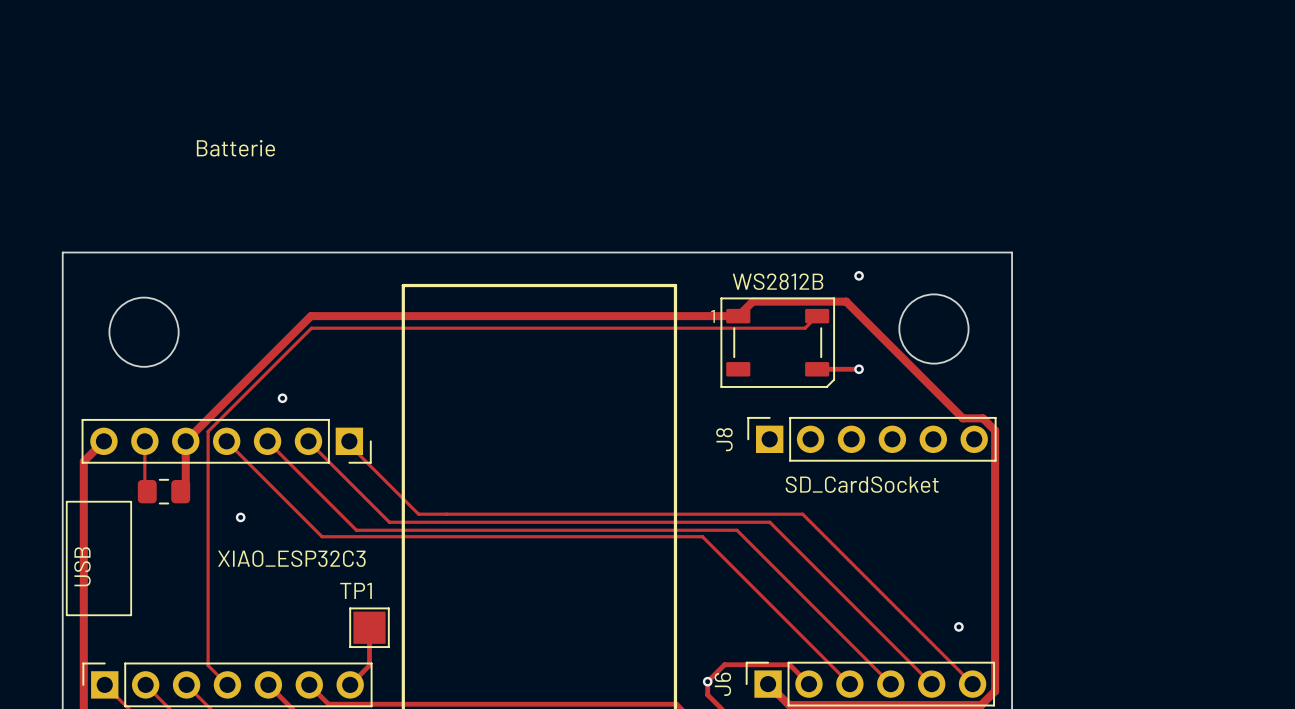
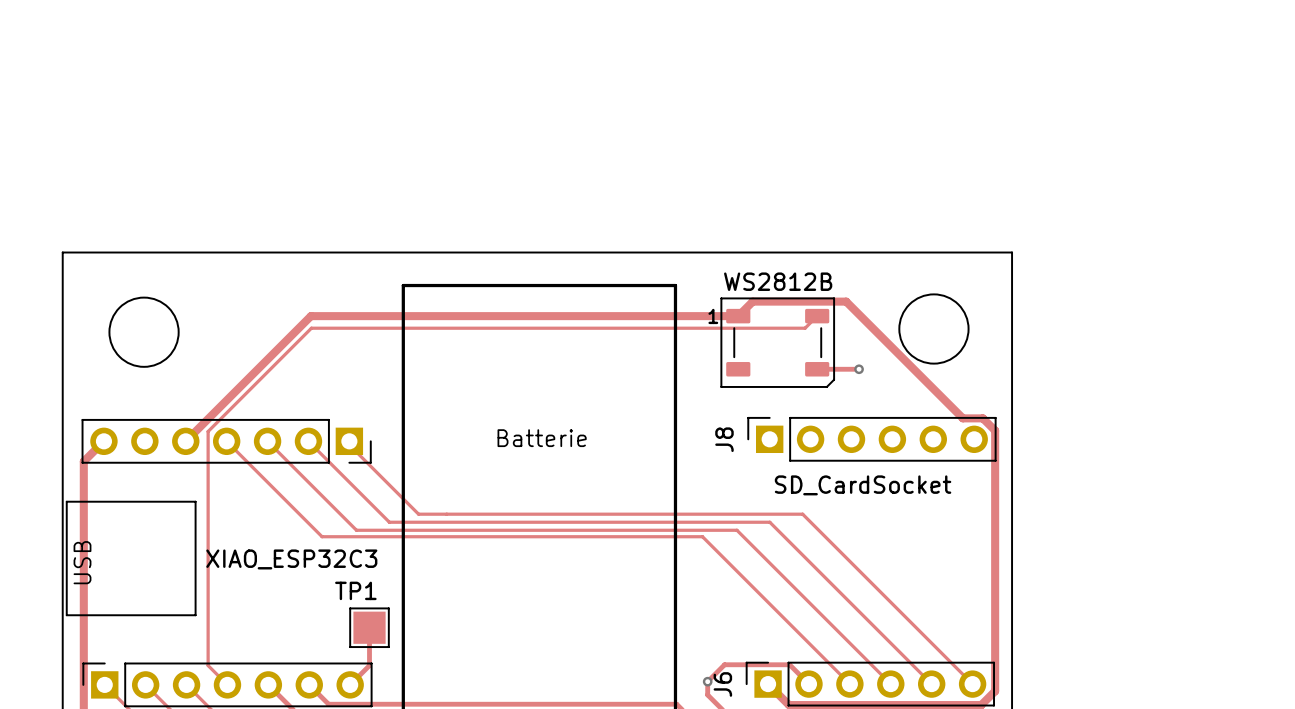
text: Batterie (235, 148) -> none
via: (859, 275) -> none
via: (282, 398) -> none
text: none -> Batterie (542, 438)
track: (144, 441) (144, 489) (147, 491) -> none
track: (185, 441) (185, 486) (180, 491) -> none
part: (163, 491) -> none
line: (131, 501) (131, 615) -> (131, 501) (195, 501) (195, 615) (131, 615)
via: (240, 517) -> none
via: (958, 626) -> none

